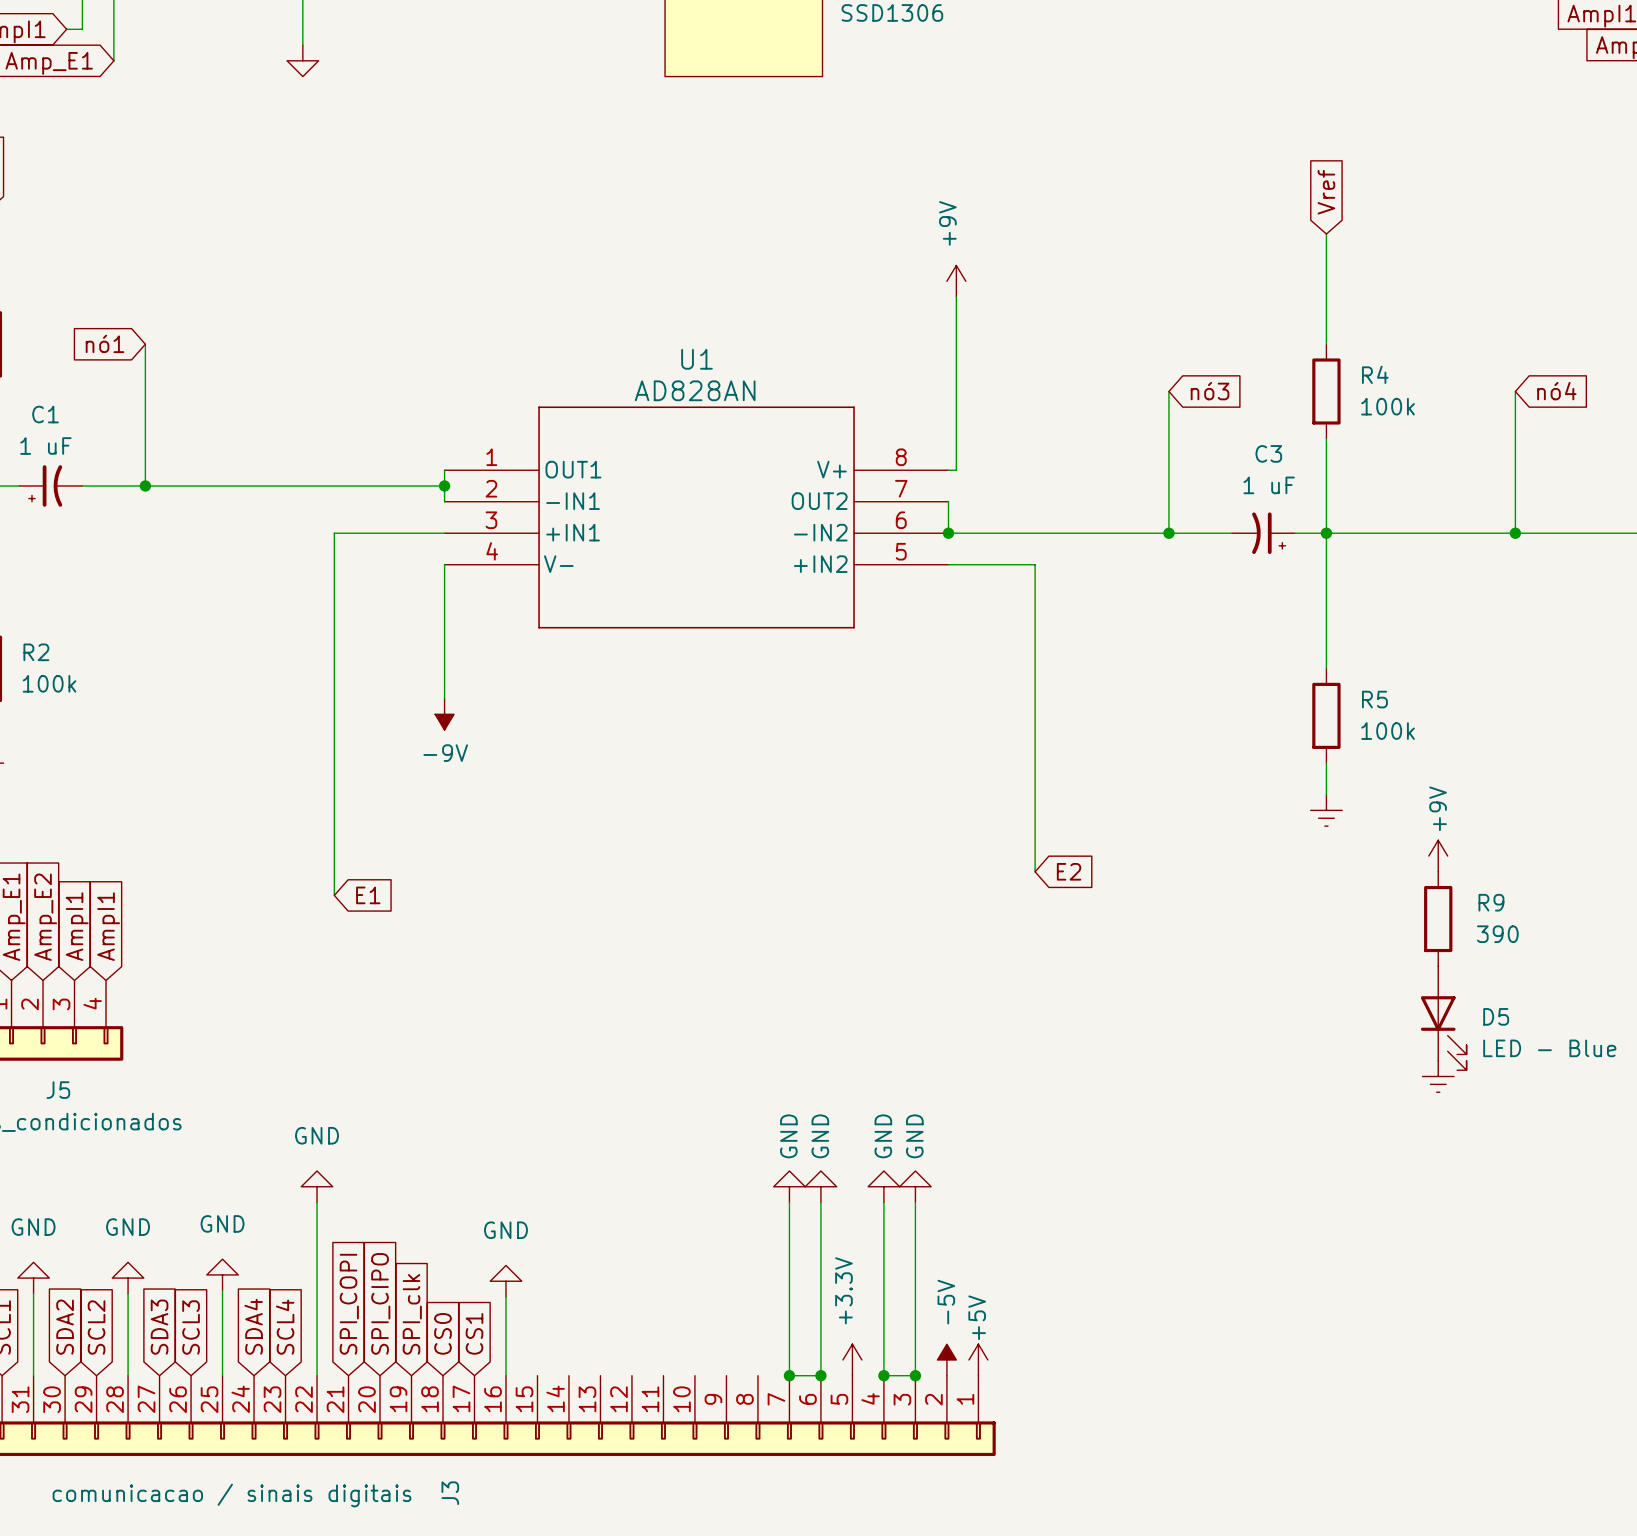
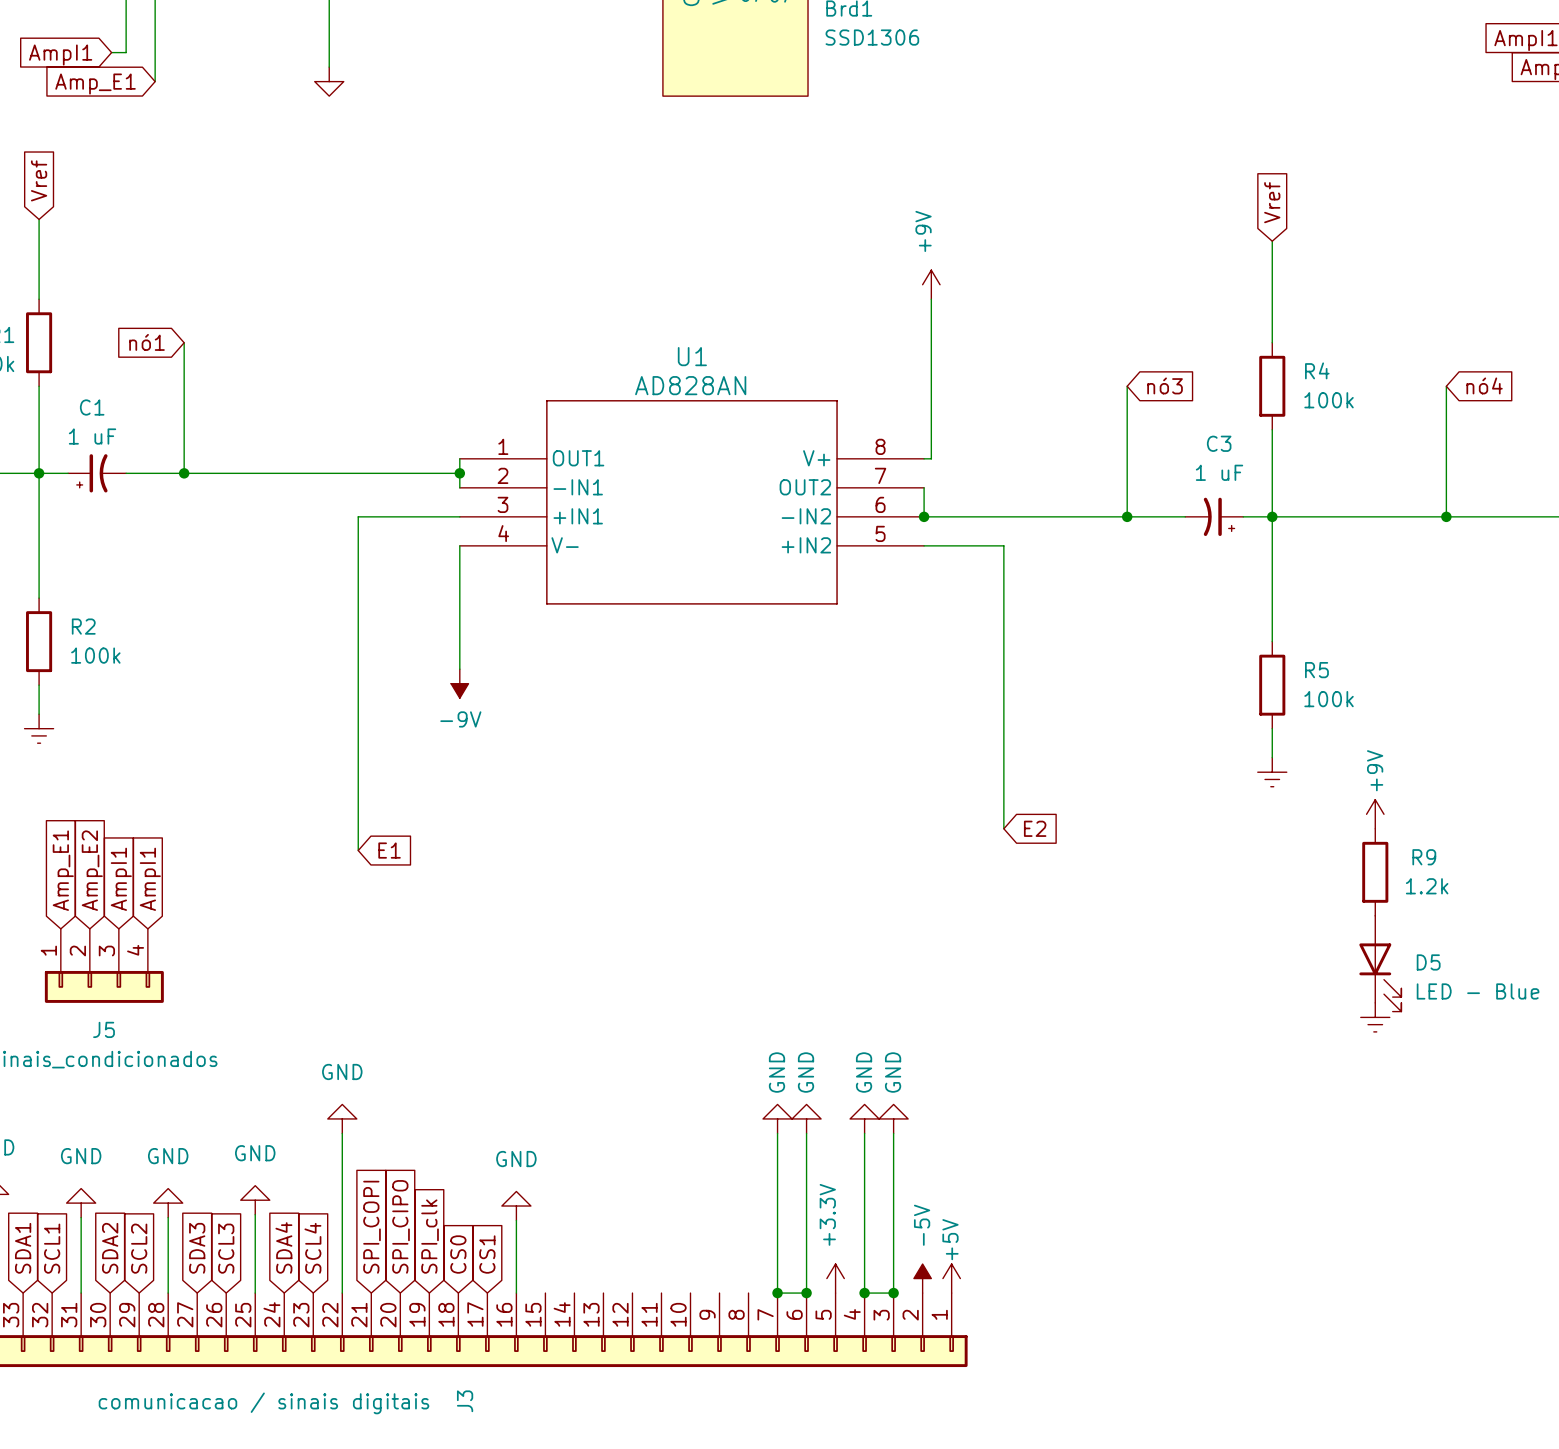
R9 value: 390 (1497, 934) -> 1.2k (1427, 886)

